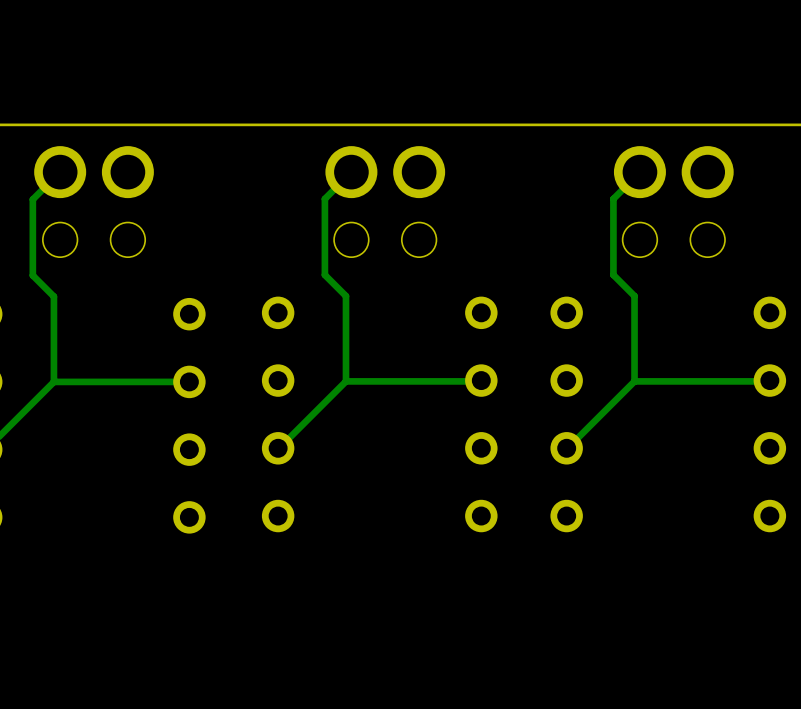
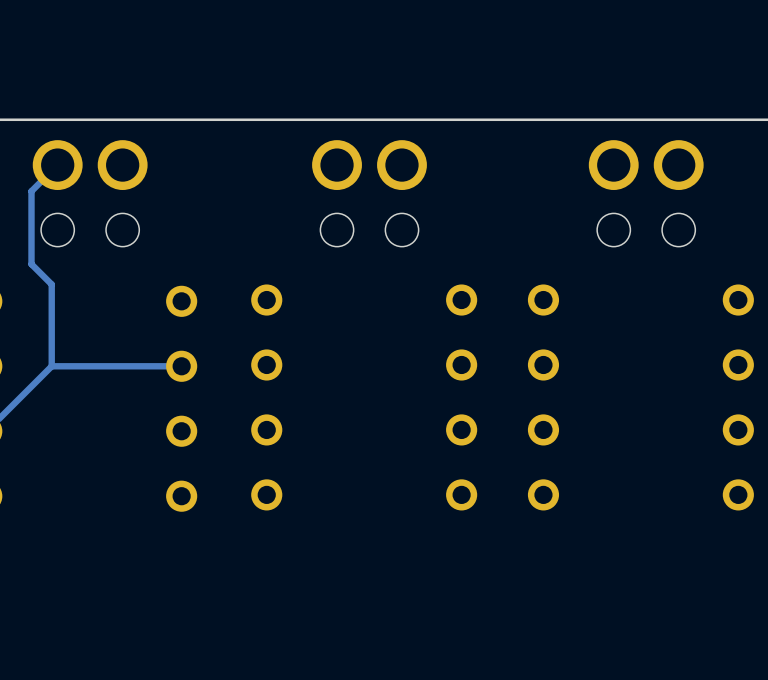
track: (352, 171) (324, 198) (324, 275) (345, 296) (345, 381) -> none
track: (640, 171) (613, 198) (613, 275) (634, 296) (634, 381) -> none
track: (345, 381) (278, 449) -> none
track: (481, 381) (345, 381) -> none
track: (634, 381) (566, 449) -> none
track: (769, 381) (634, 381) -> none

